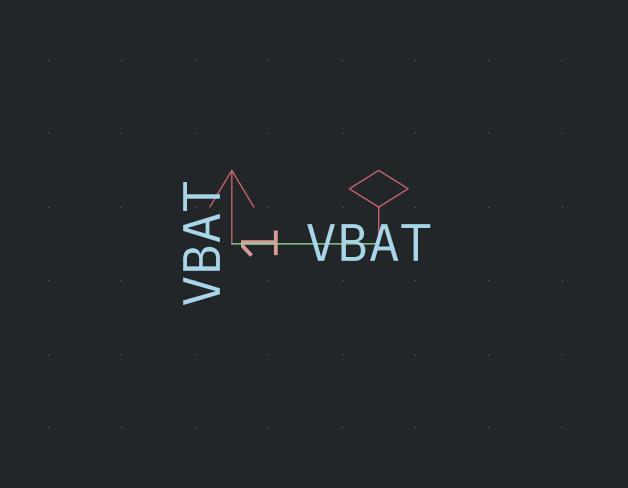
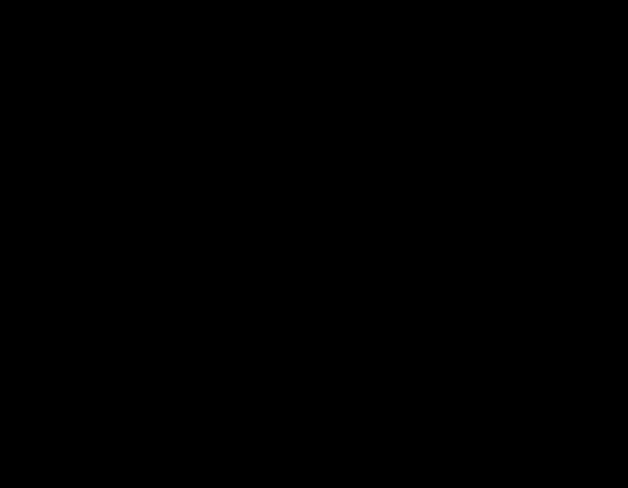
power symbol: VBAT (231, 207) -> none
power symbol: (378, 207) -> none
wire: (231, 243) (378, 243) -> none

